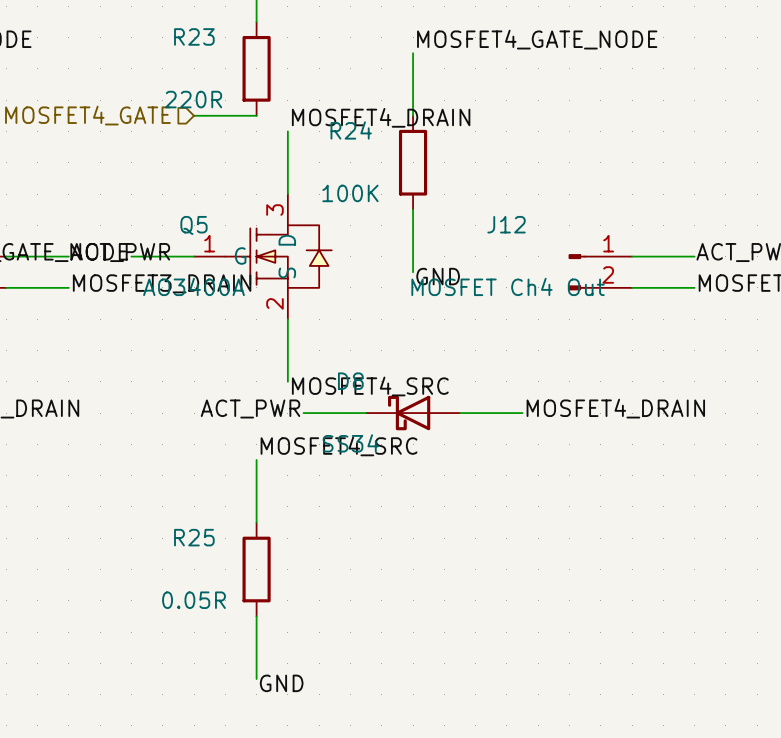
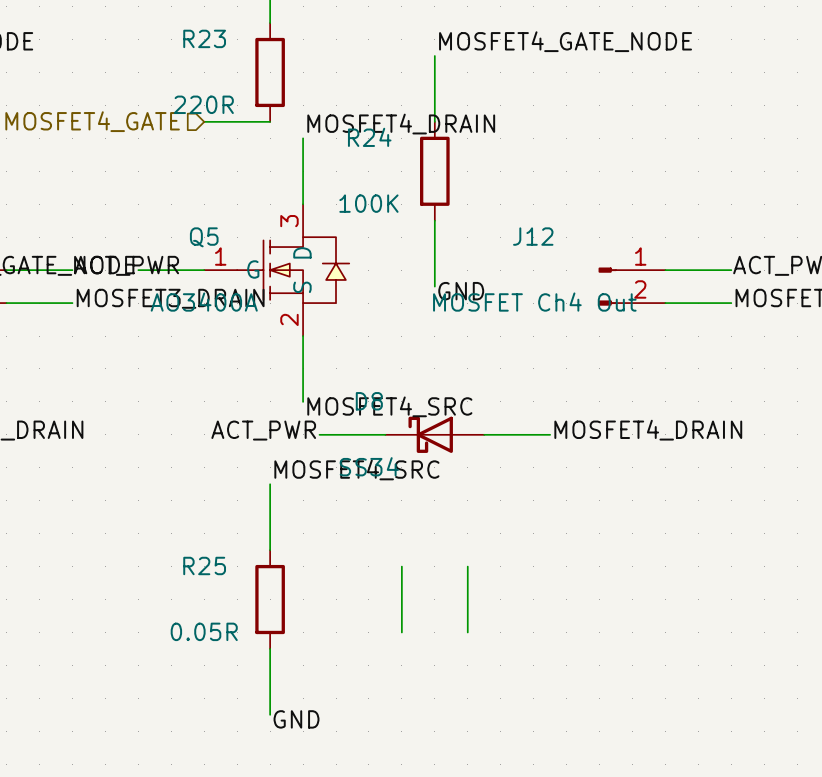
wire: none -> (401, 566) (401, 632)
wire: none -> (467, 566) (467, 632)

